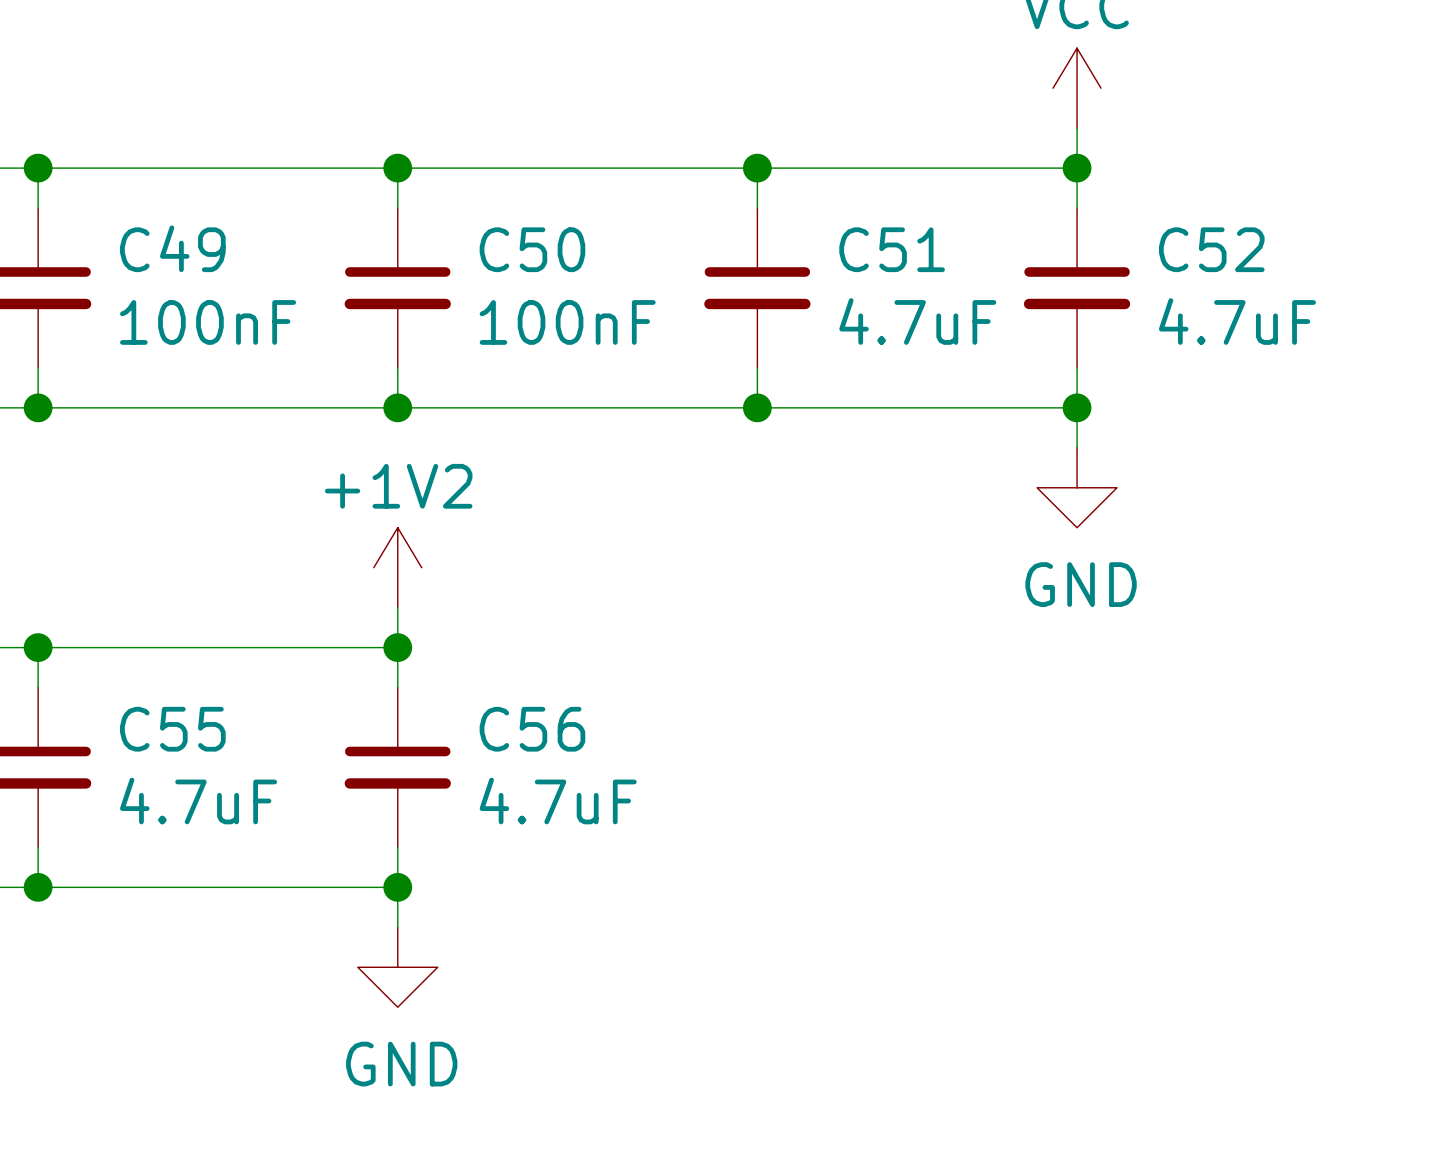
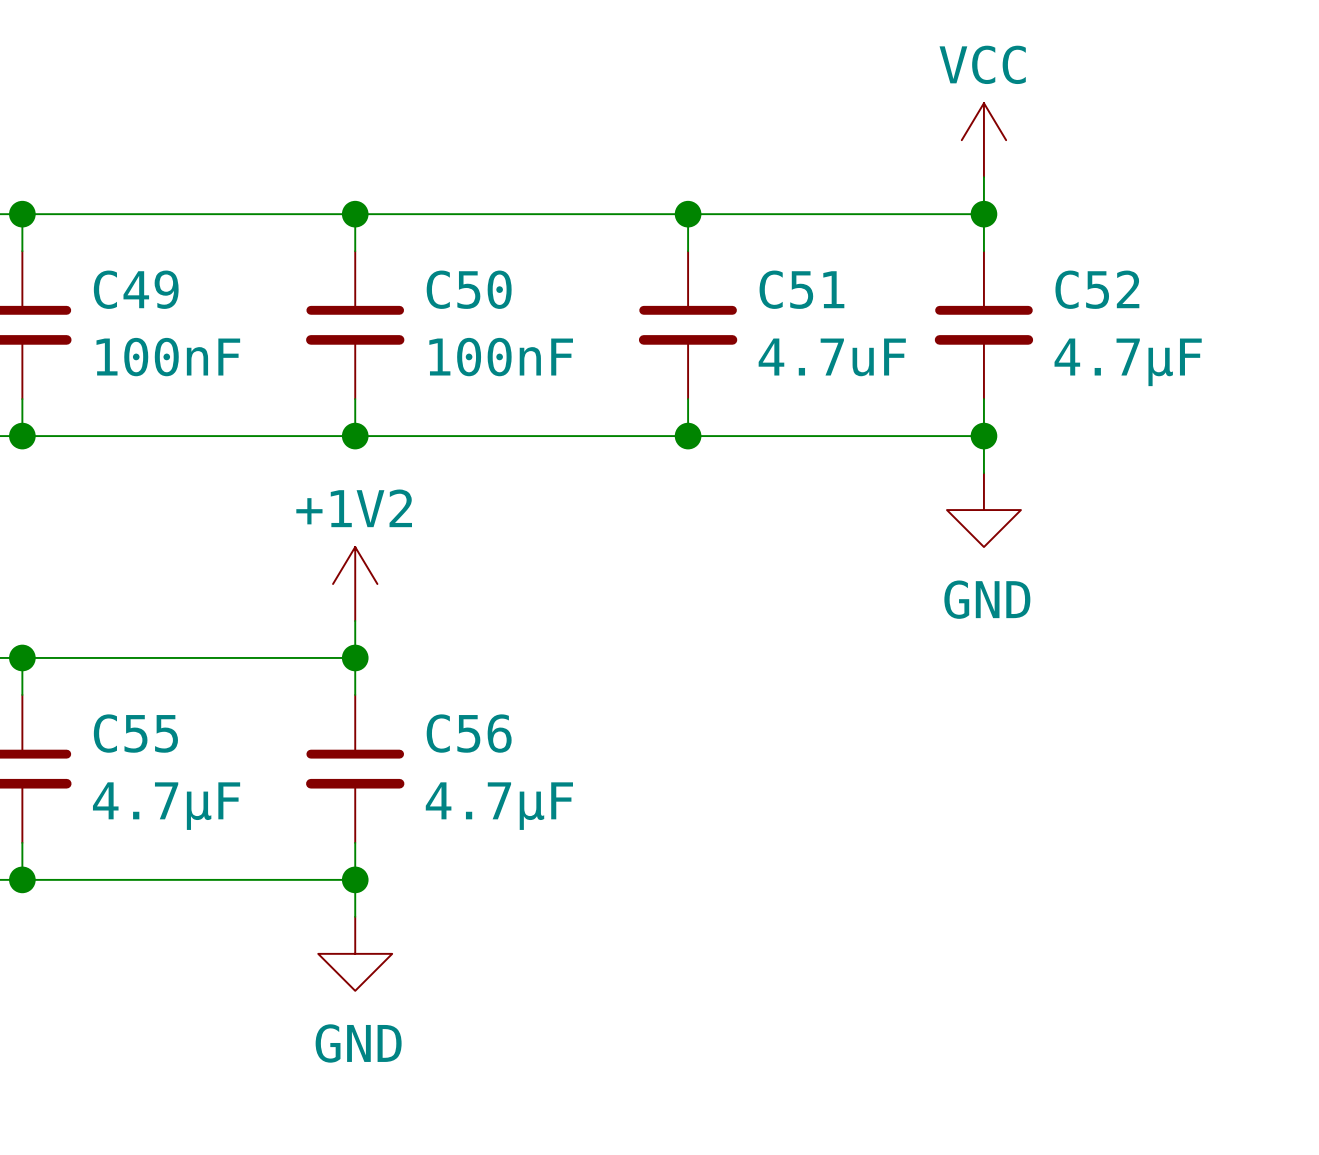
C52 value: 4.7uF (1237, 321) -> 4.7µF (1128, 362)
C55 value: 4.7uF (198, 801) -> 4.7µF (166, 806)
C56 value: 4.7uF (558, 801) -> 4.7µF (499, 806)

